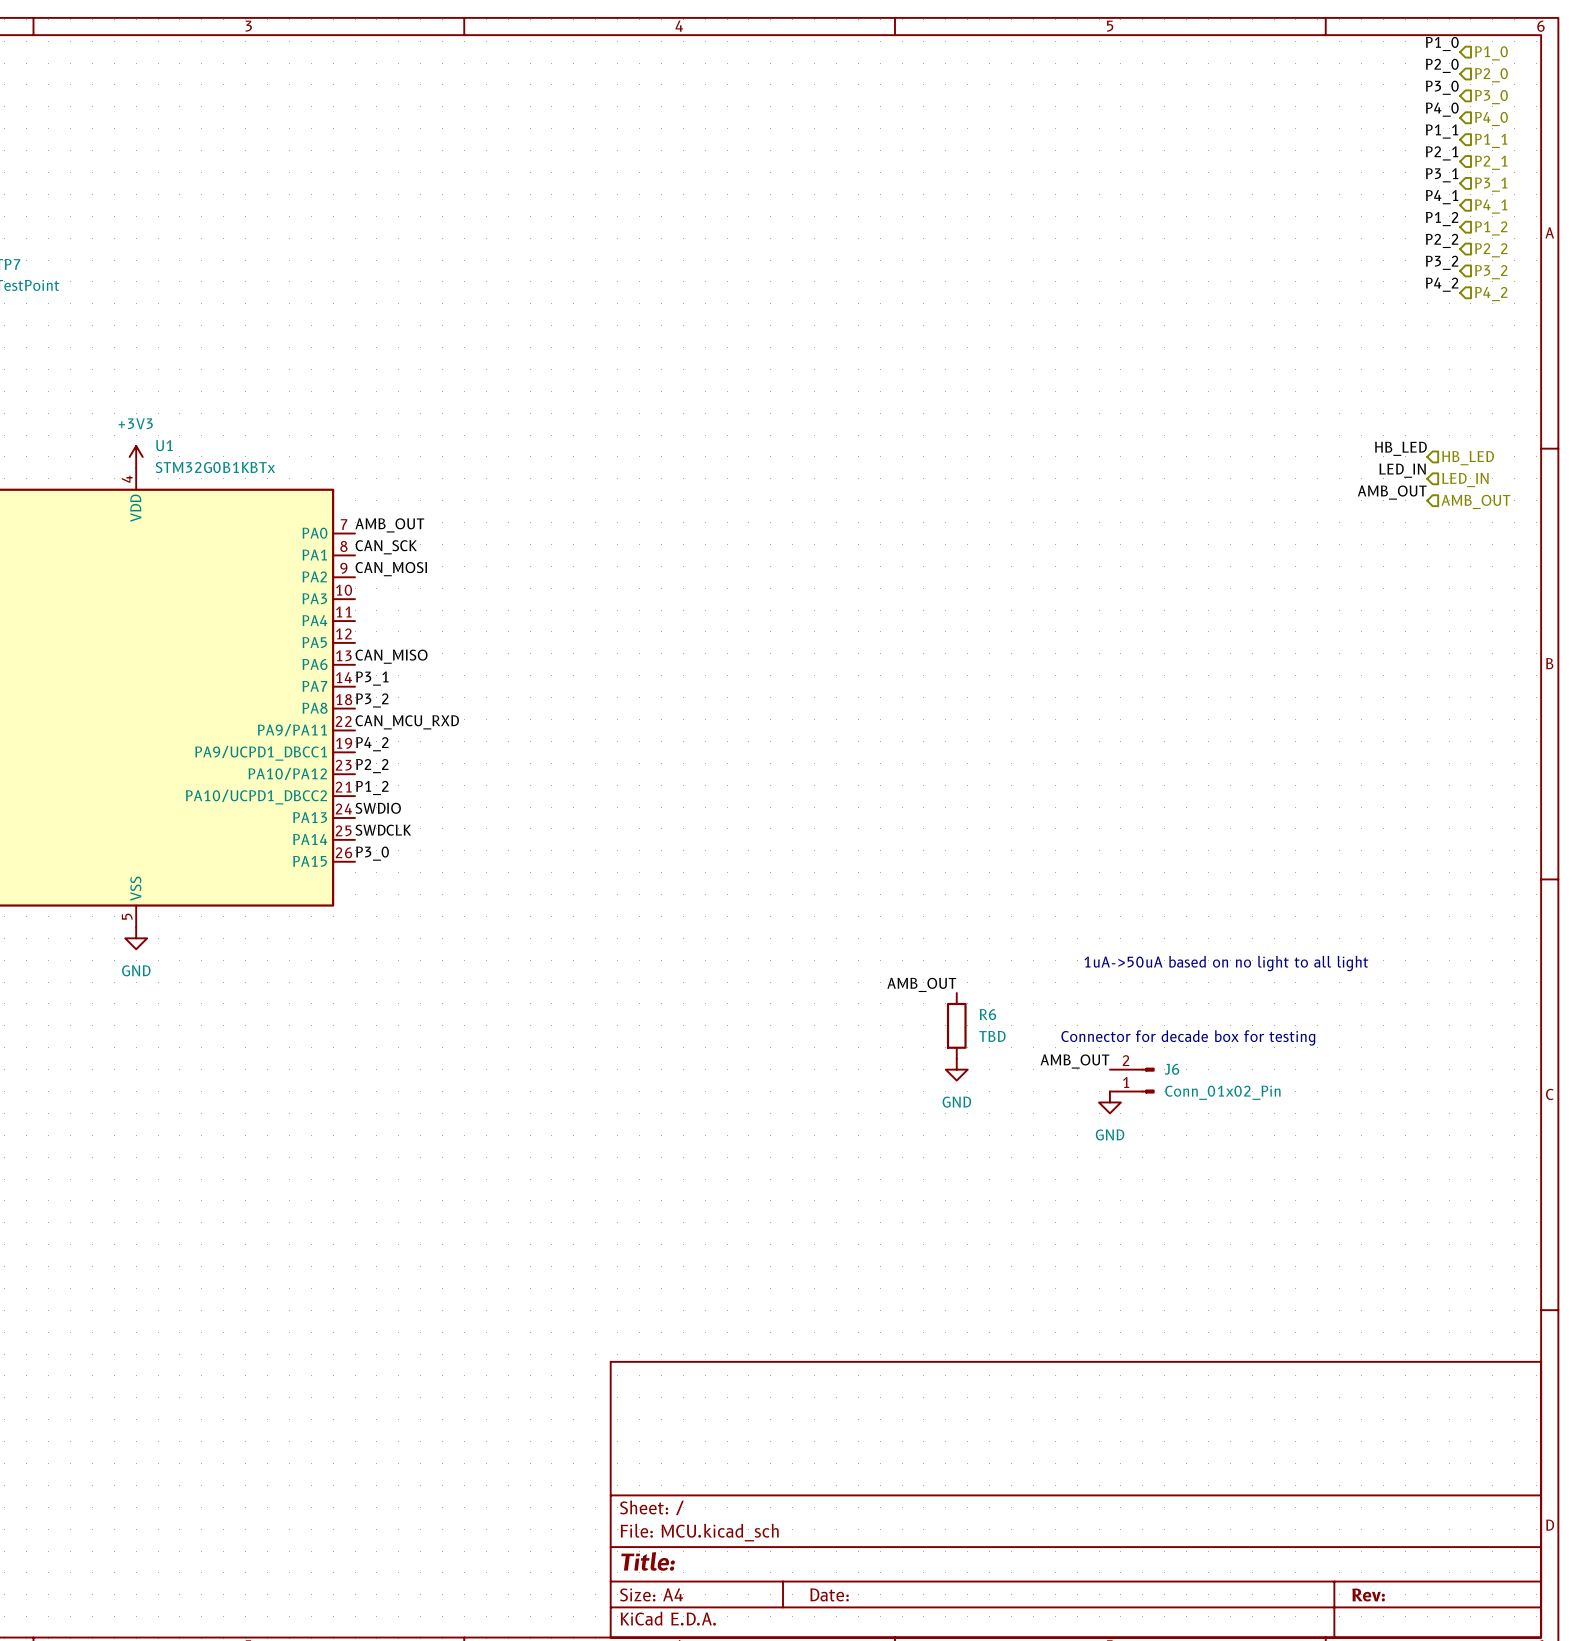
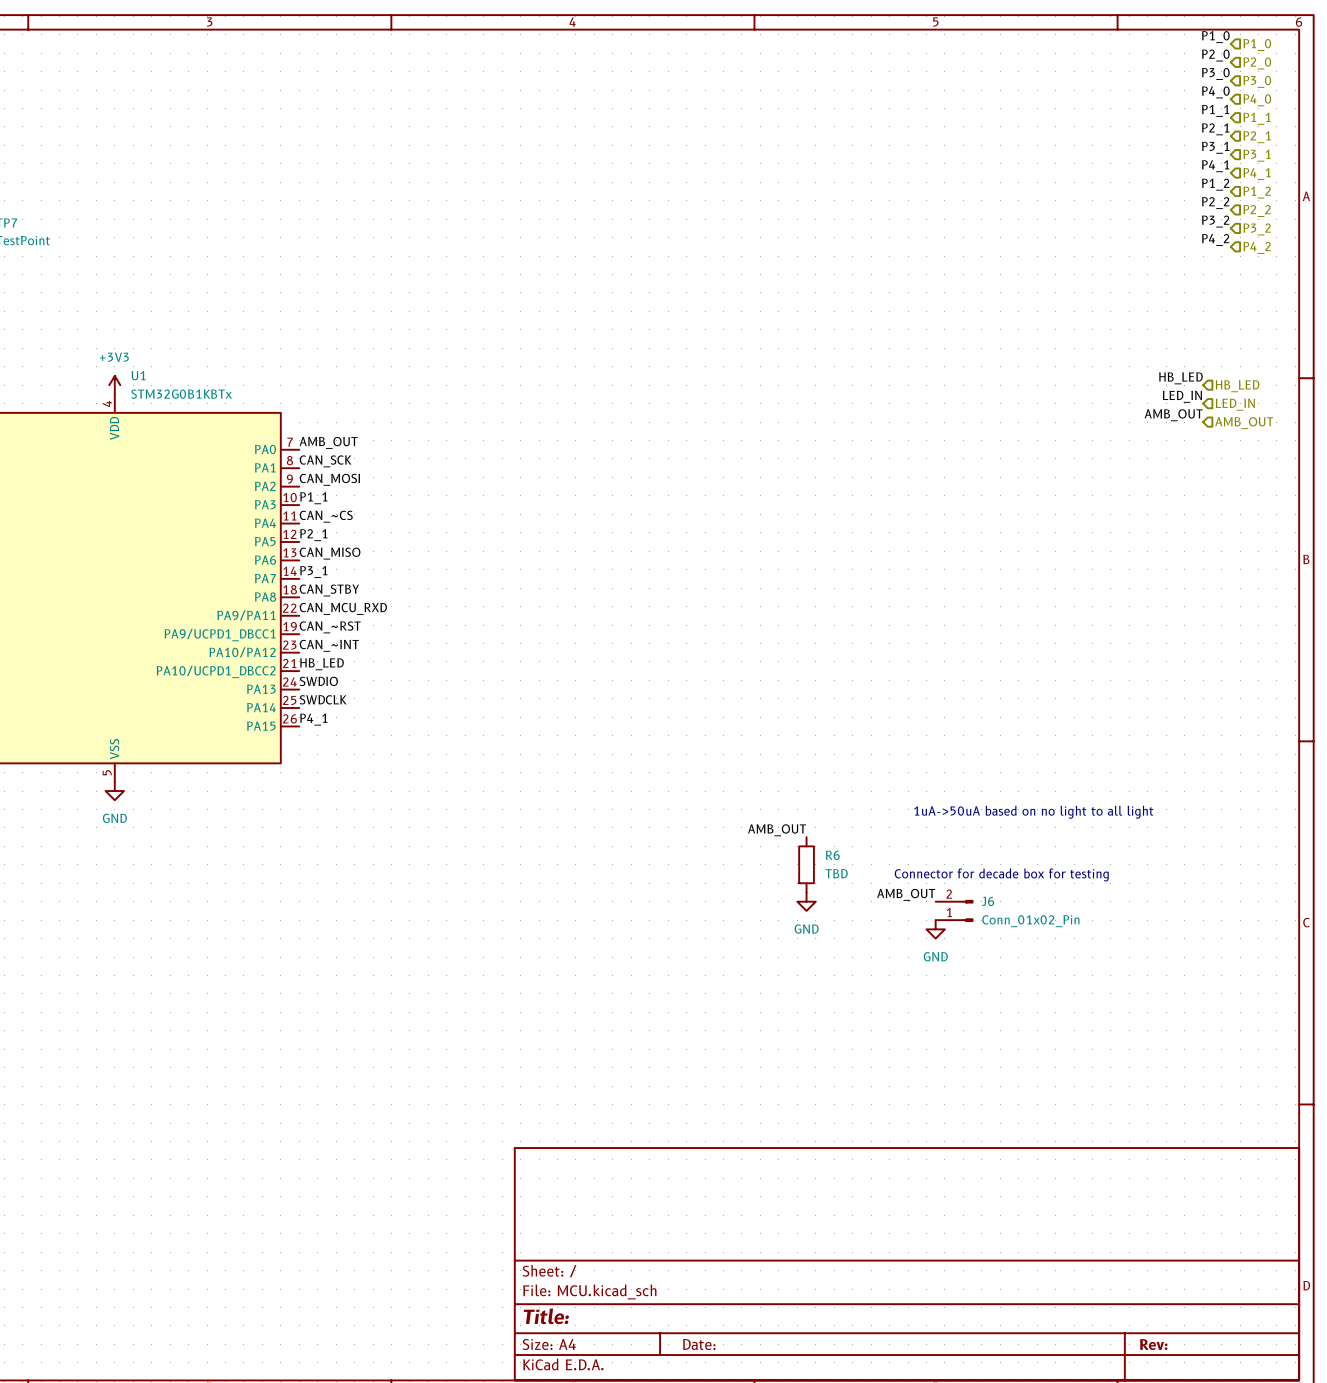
label: none -> P1_1 (313, 498)
label: none -> CAN_~CS (326, 516)
label: none -> P2_1 (313, 535)
label: P3_2 (372, 700) -> CAN_STBY (329, 590)
label: P4_2 (372, 744) -> CAN_~RST (330, 627)
label: P2_2 (372, 766) -> CAN_~INT (329, 645)
label: P1_2 (372, 787) -> HB_LED (321, 664)
label: P3_0 (372, 853) -> P4_1 (313, 719)

